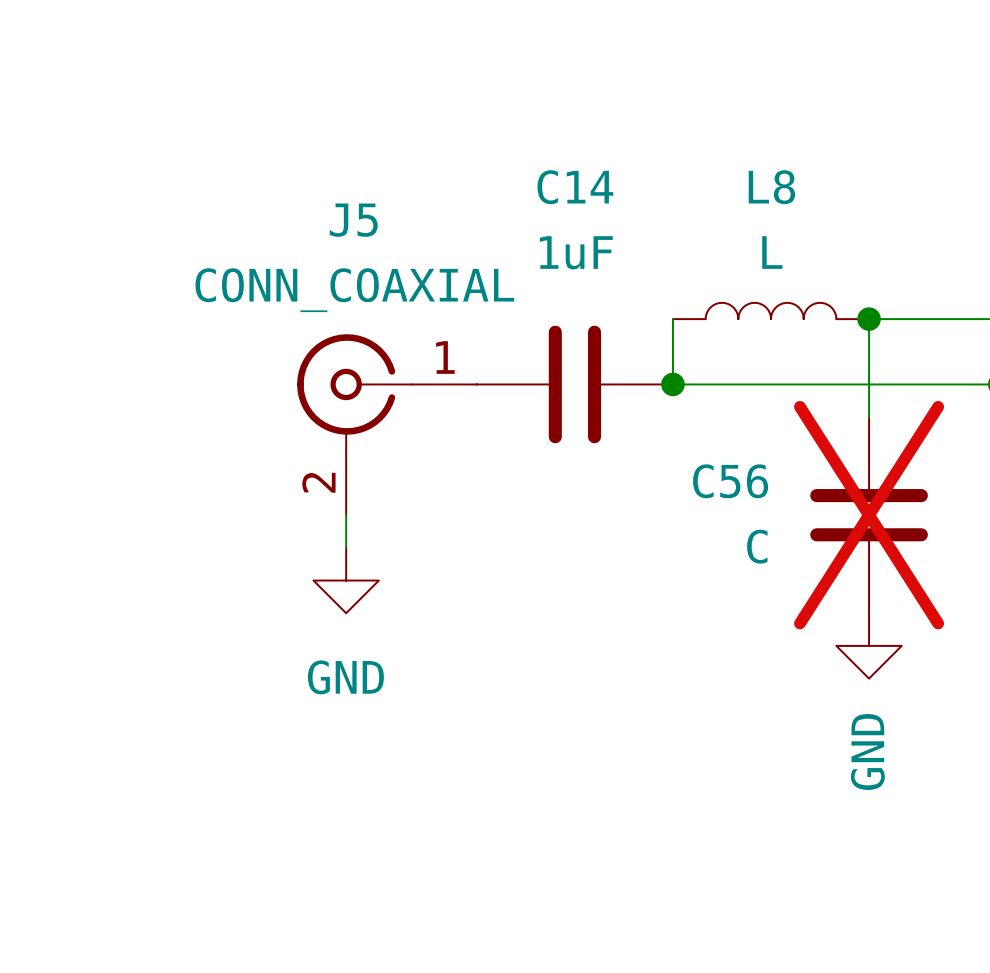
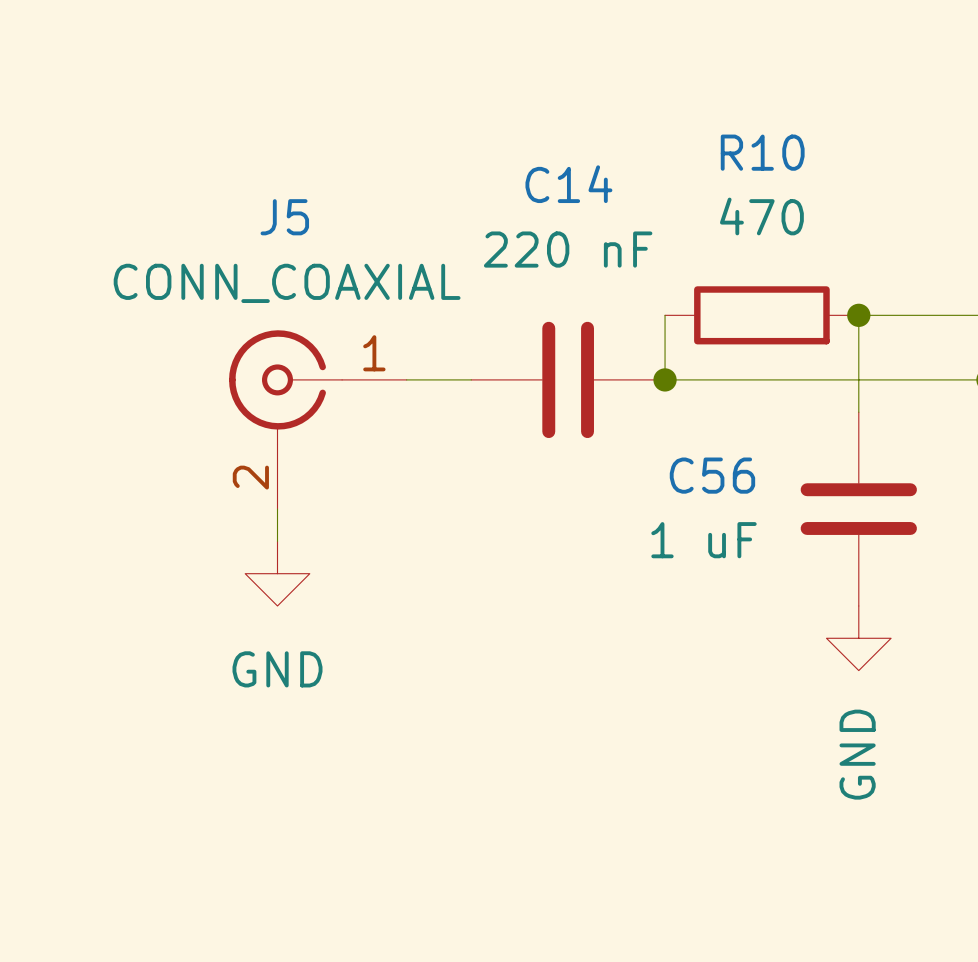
C14 value: 1uF (576, 252) -> 220 nF (568, 249)
L8: L (771, 310) -> none
R10: none -> 470 (761, 315)
J5 position: (387, 424) -> (317, 419)
wire: (346, 515) (346, 547) -> (277, 509) (277, 541)
C56 do-not-place cross: (869, 515) -> none
C56 value: C (757, 546) -> 1 uF (704, 540)
power symbol position: GND (346, 580) -> GND (277, 573)

